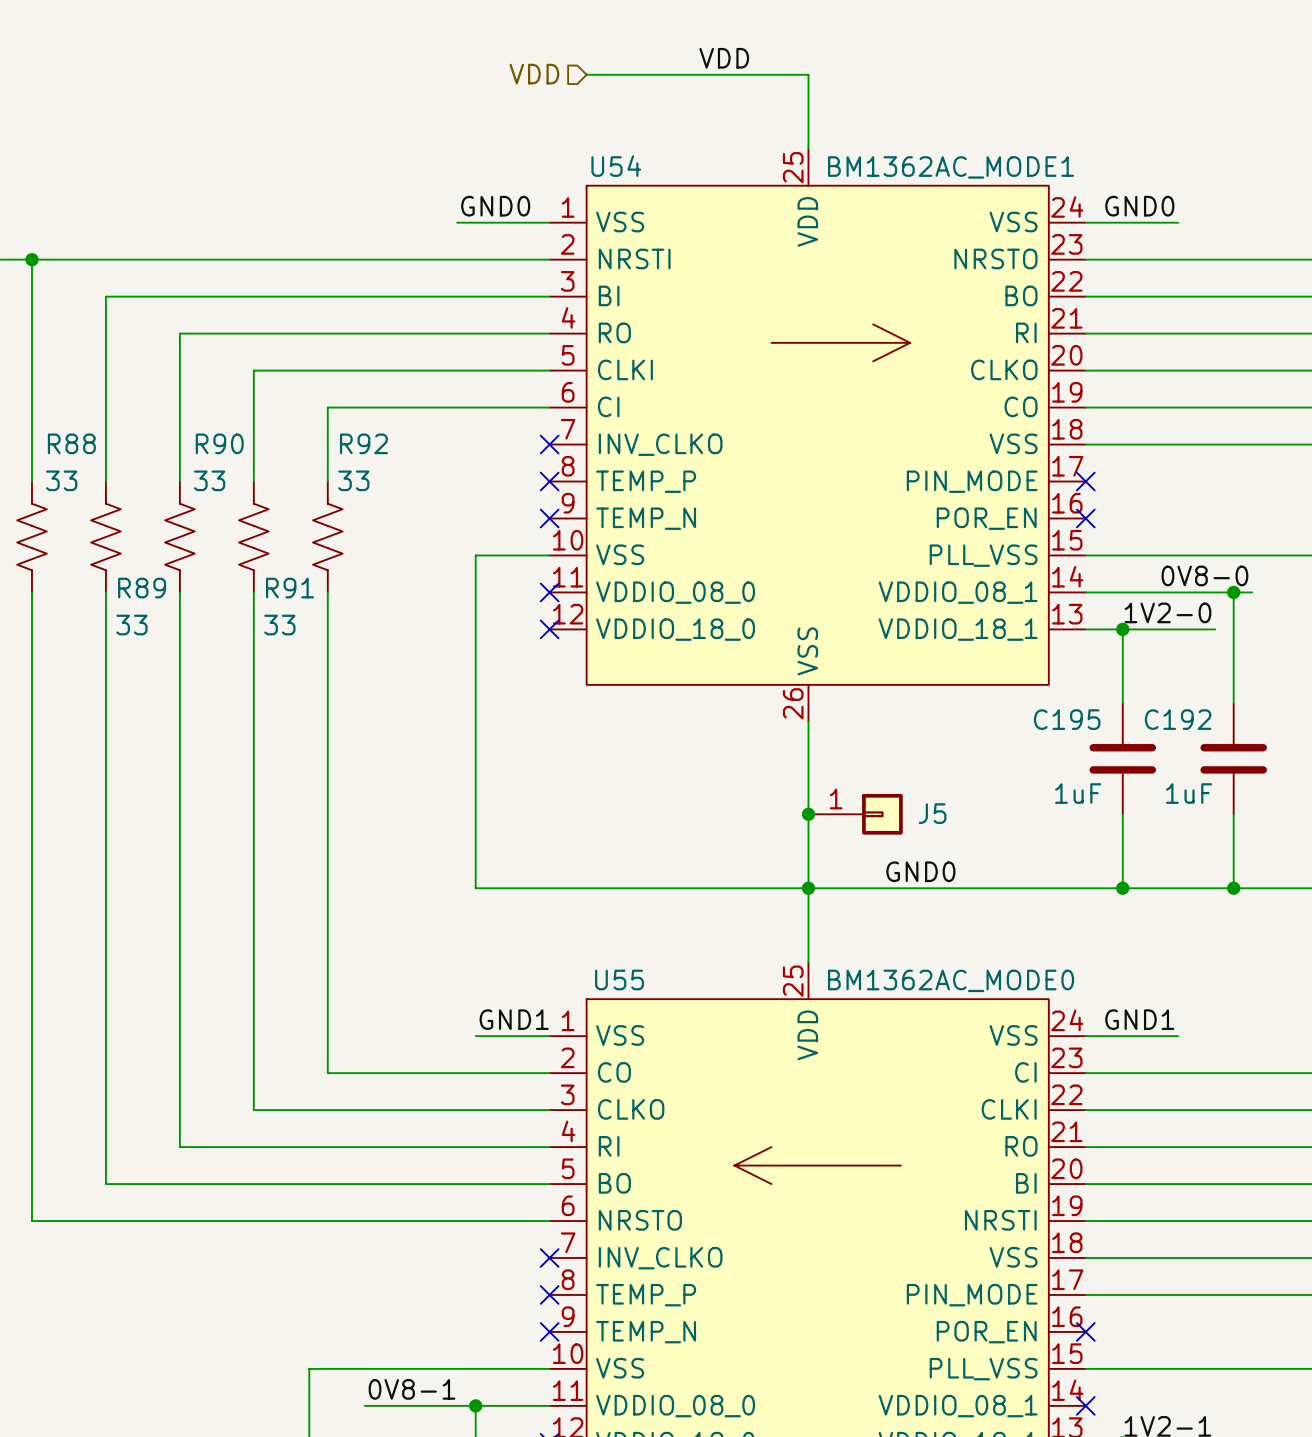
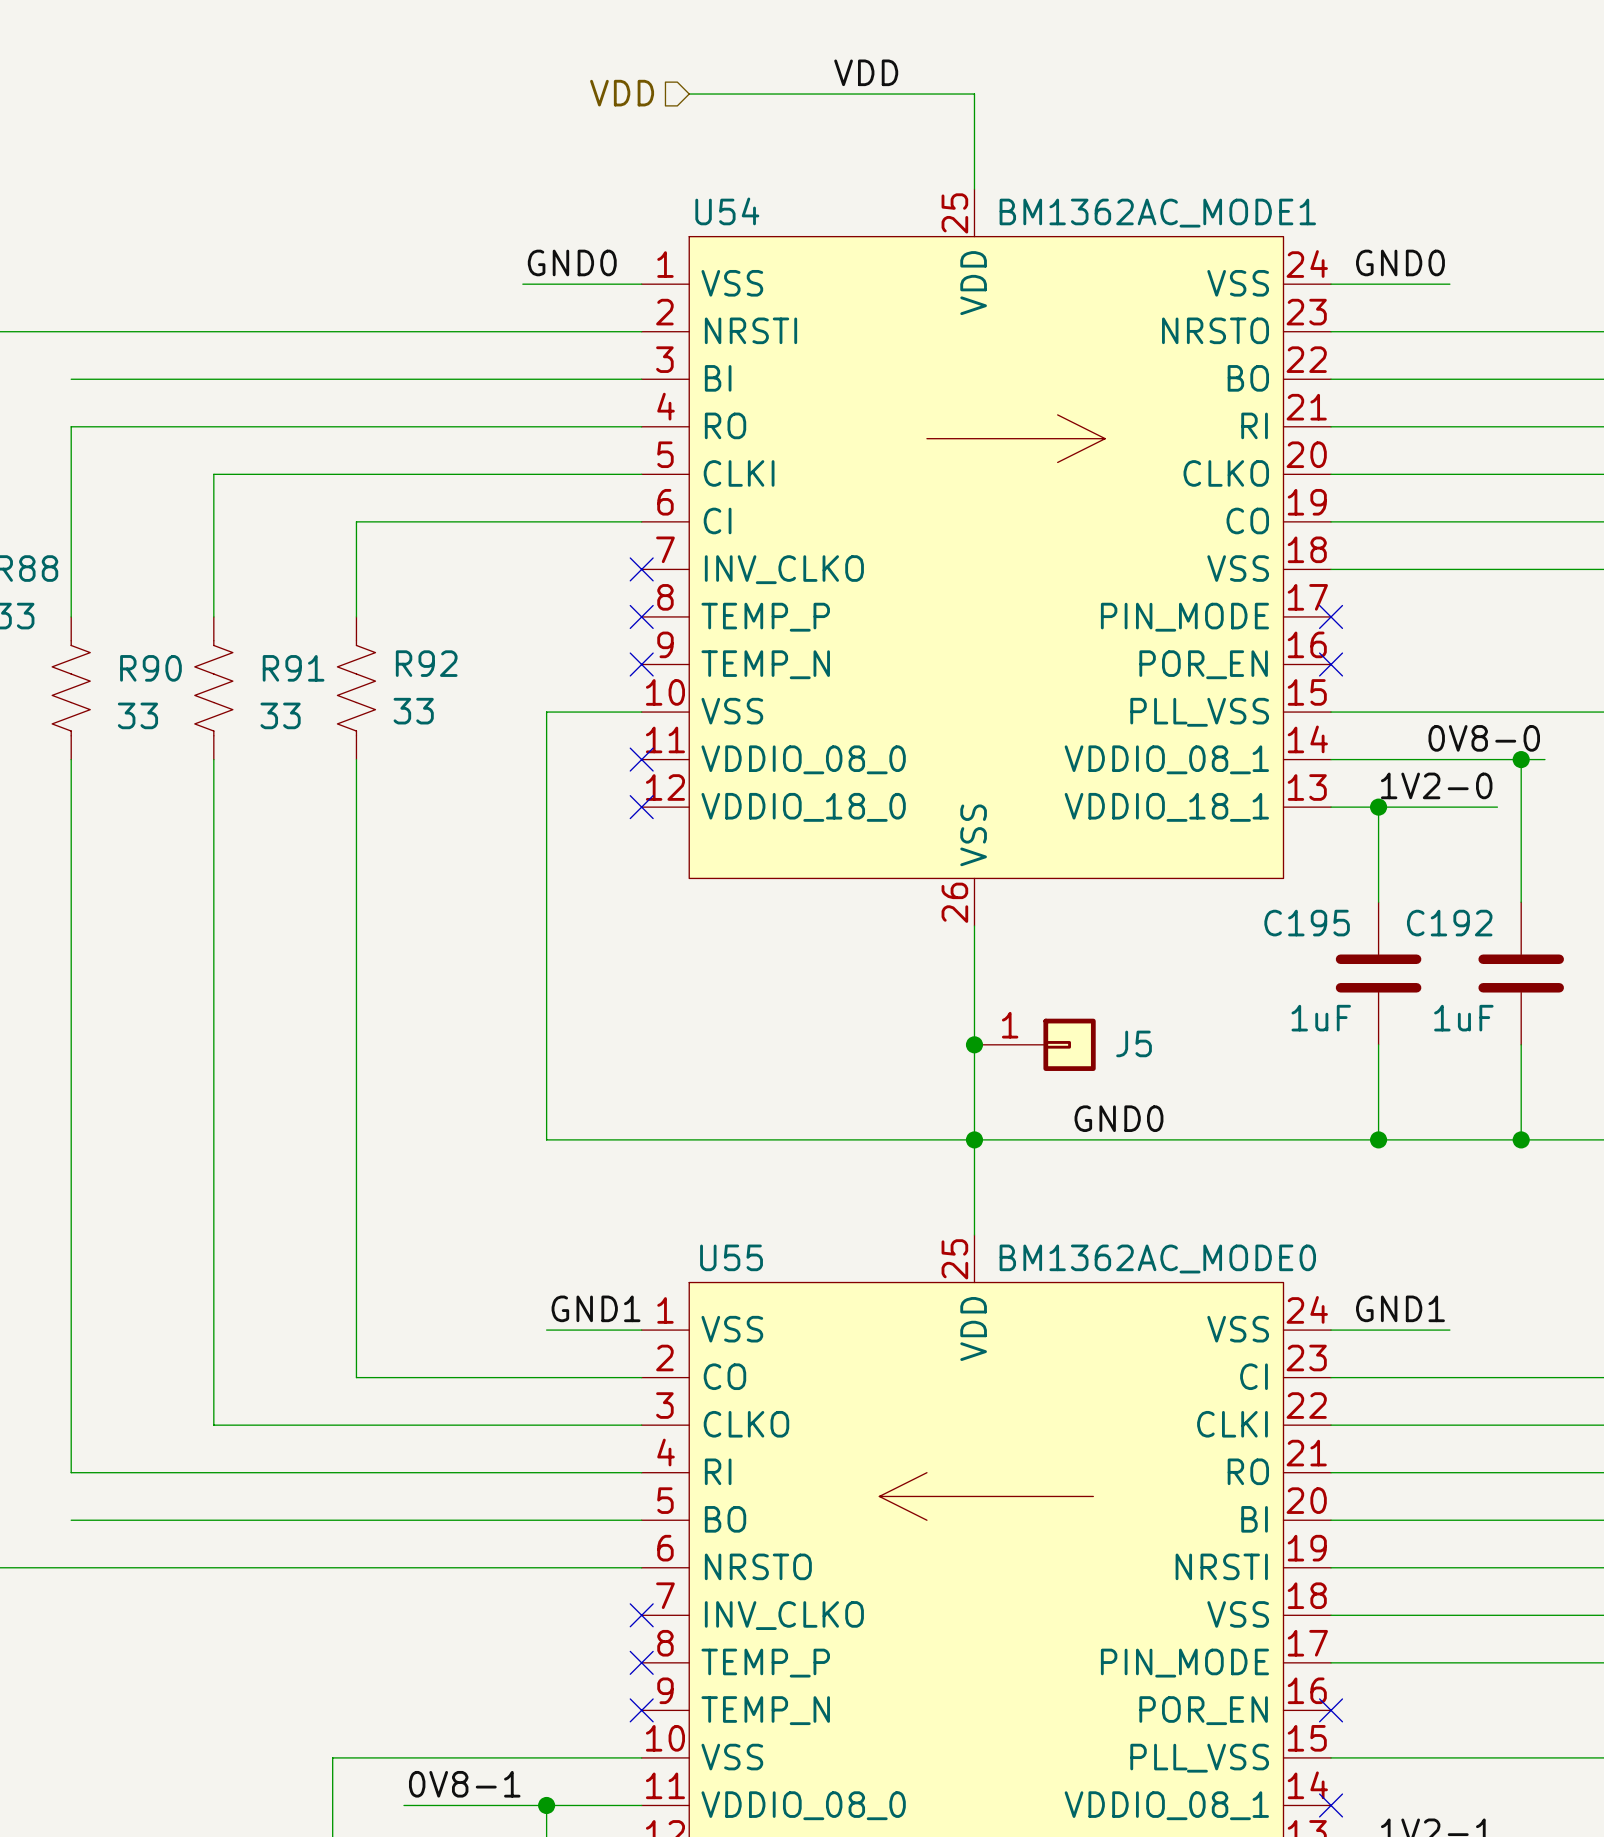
wire: (105, 296) (105, 333) -> (166, 426) (71, 426)
wire: (179, 333) (179, 481) -> none
wire: (253, 370) (253, 481) -> (261, 474) (213, 474) (213, 616)
R92 name position: R92 (363, 443) -> R92 (426, 663)
R92 value position: 33 (353, 480) -> 33 (413, 711)
R90: 33 (179, 536) -> none
R91 position: (253, 536) -> (213, 688)
R89 name: R89 (142, 588) -> R90 (150, 668)
R91 name position: R91 (289, 588) -> R91 (293, 668)
wire: (179, 592) (179, 1147) -> none
wire: (253, 592) (253, 1110) -> (213, 759) (213, 1425) (261, 1425)
R89 value position: 33 (131, 625) -> 33 (137, 715)
R91 value position: 33 (279, 625) -> 33 (280, 715)
wire: (105, 1147) (105, 1184) -> (71, 1472) (166, 1472)

